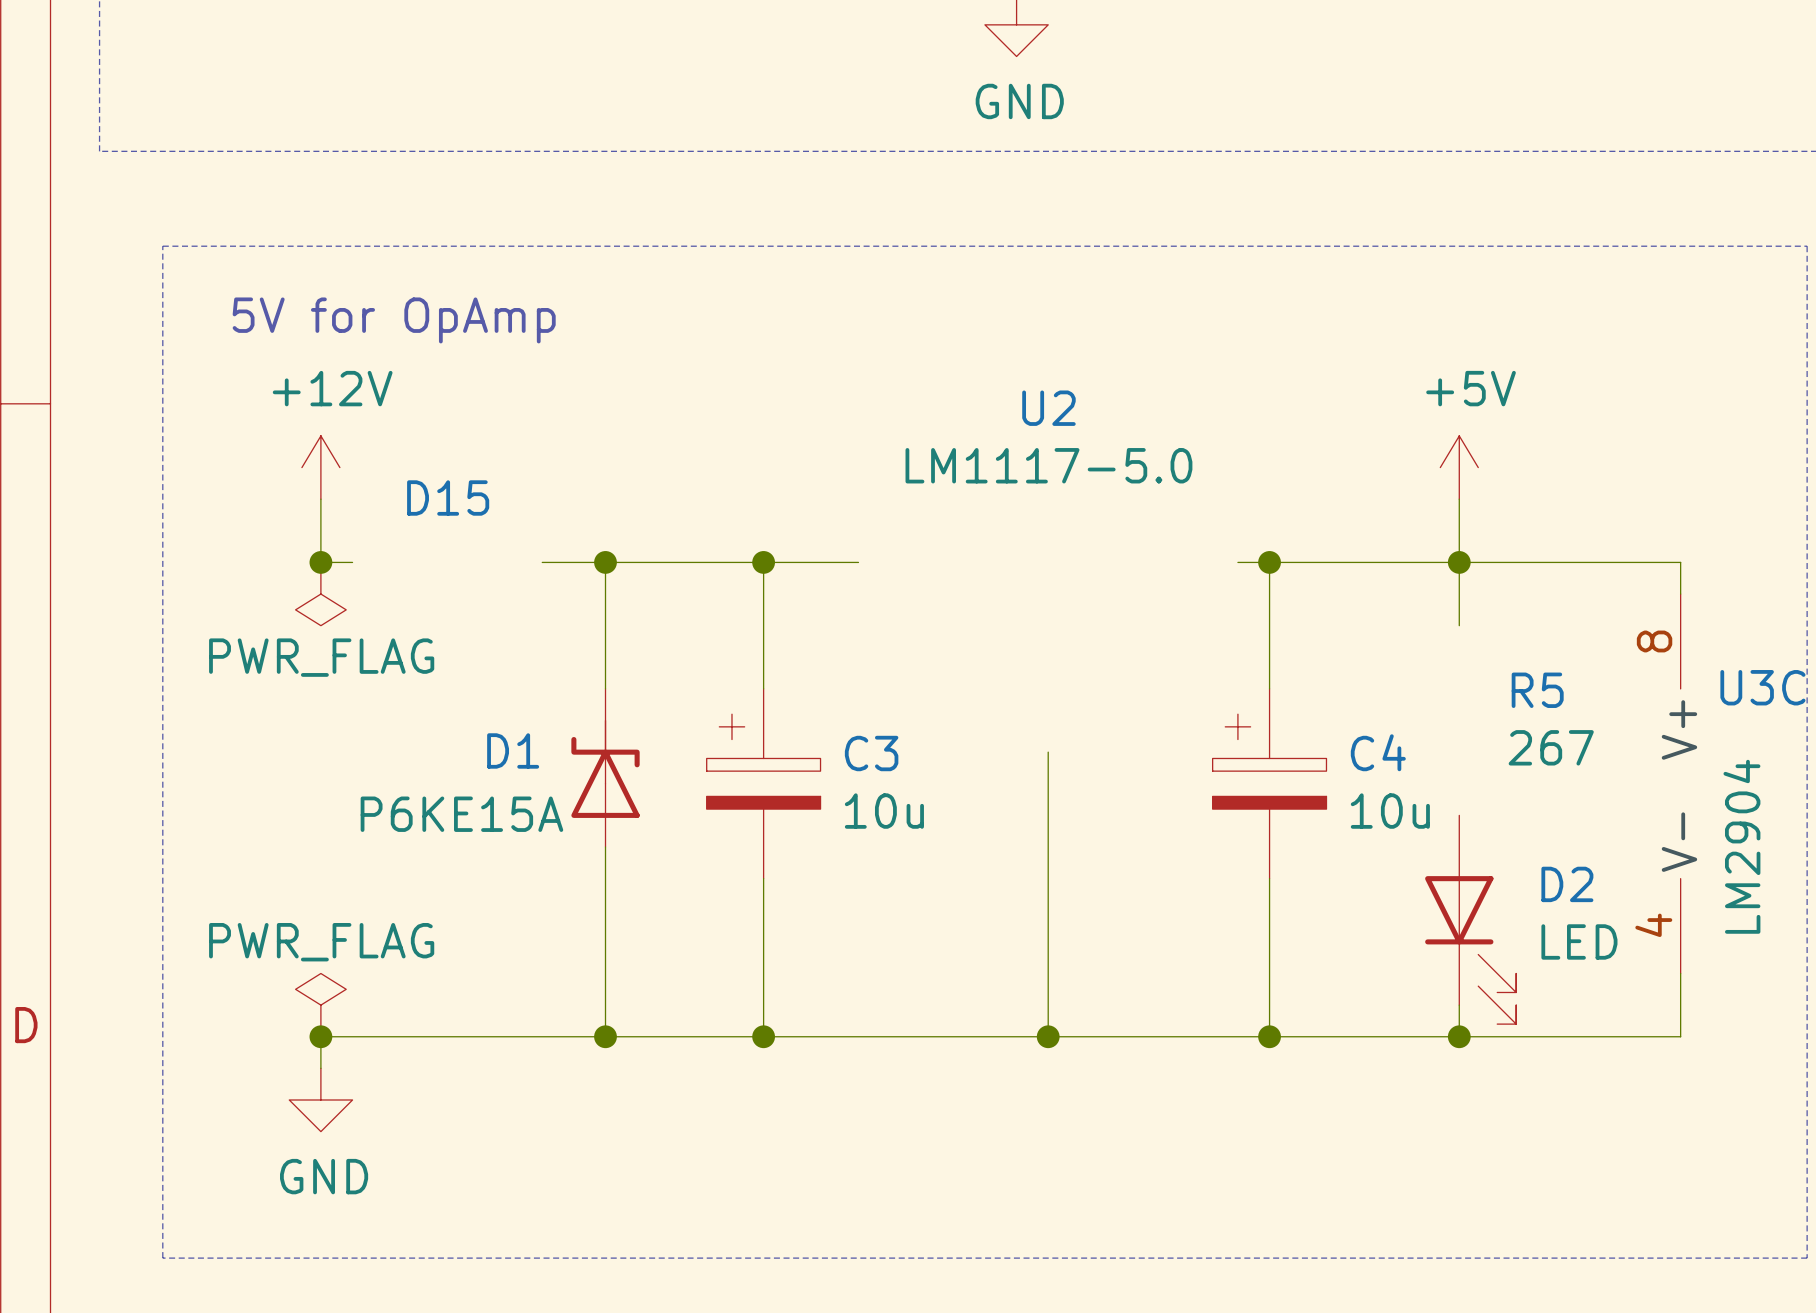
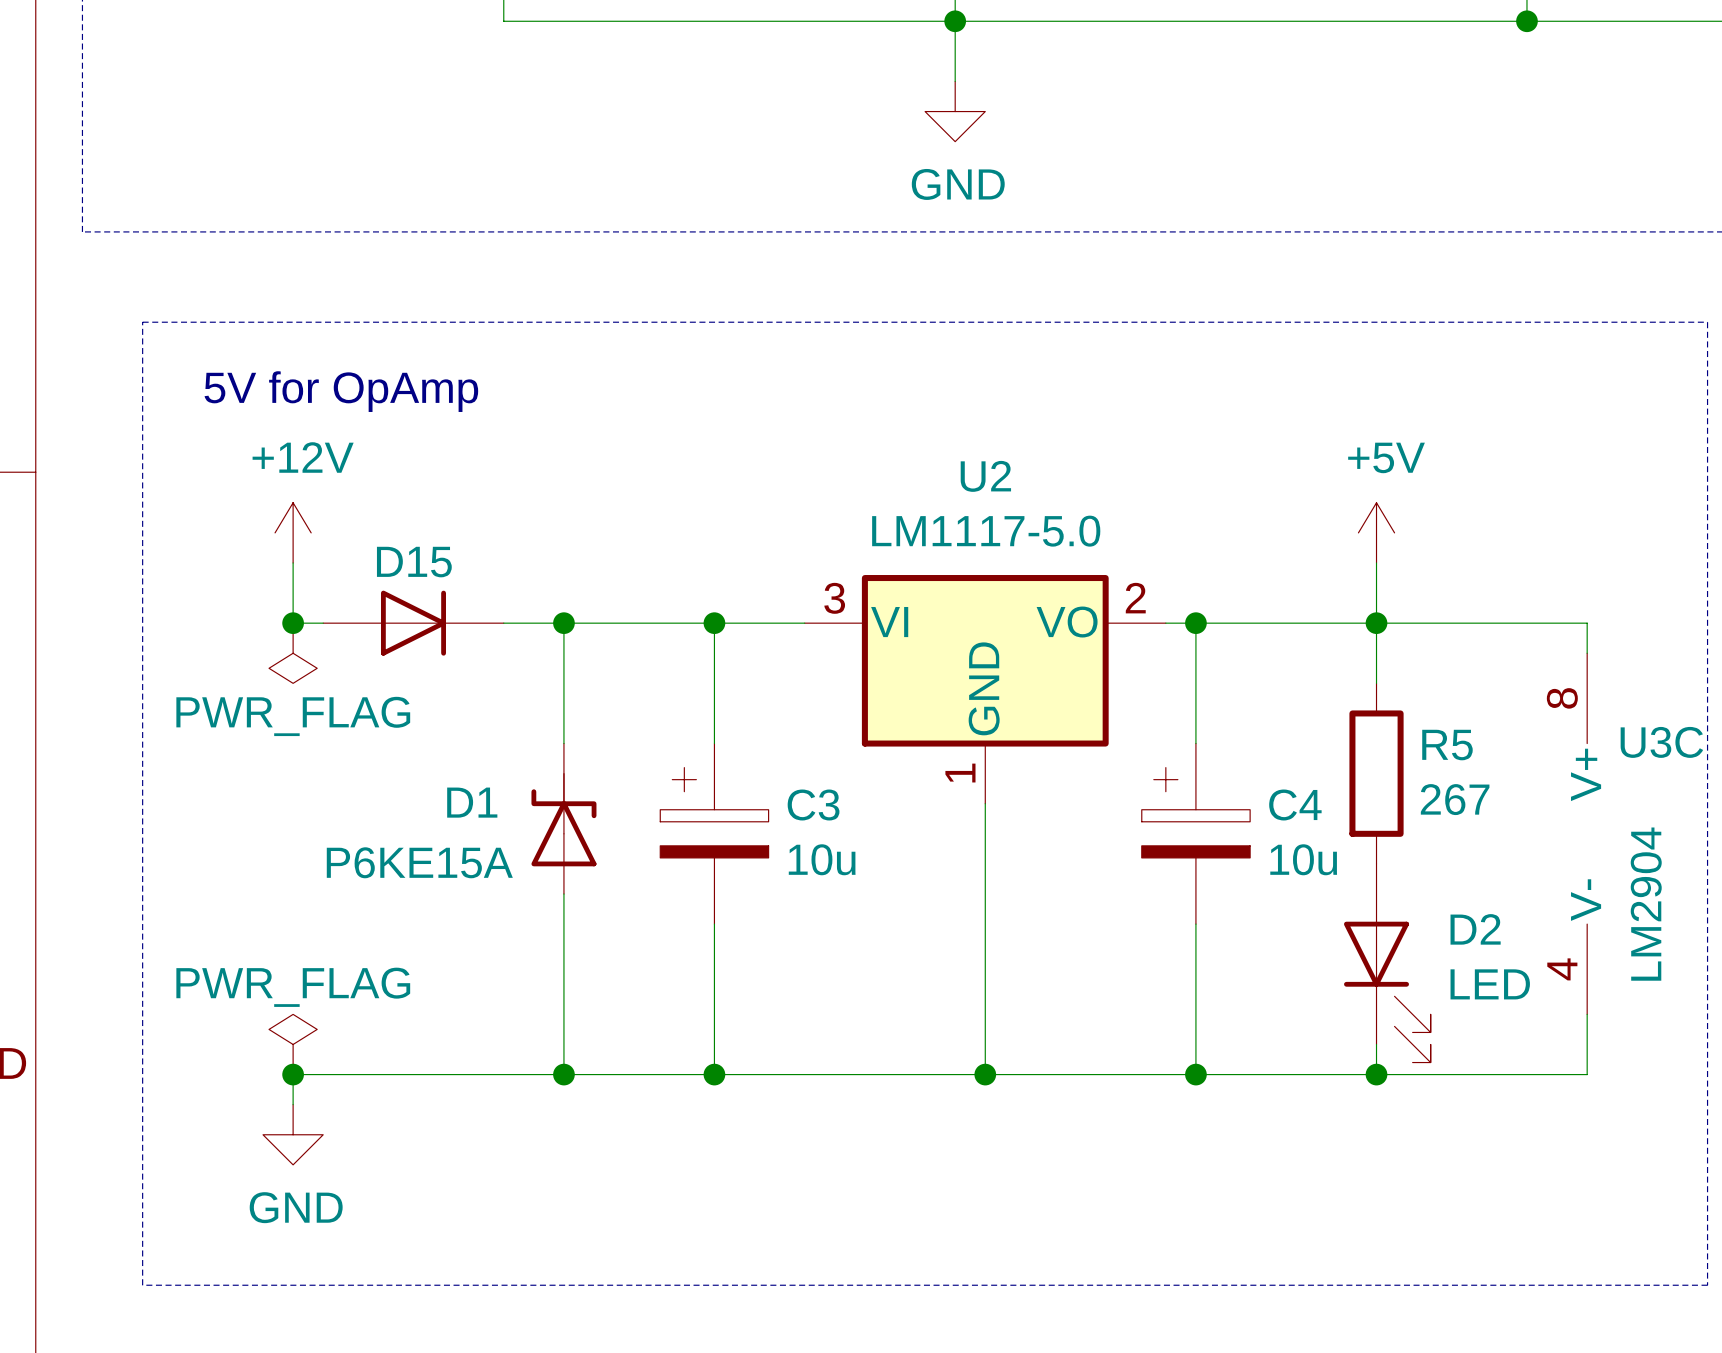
U2 symbol: [905, 390, 1193, 484] -> [804, 575, 1166, 804]
D15 symbol: [407, 480, 490, 516] -> [323, 590, 504, 656]
R5 symbol: [1508, 672, 1594, 766] -> [1349, 683, 1404, 864]

